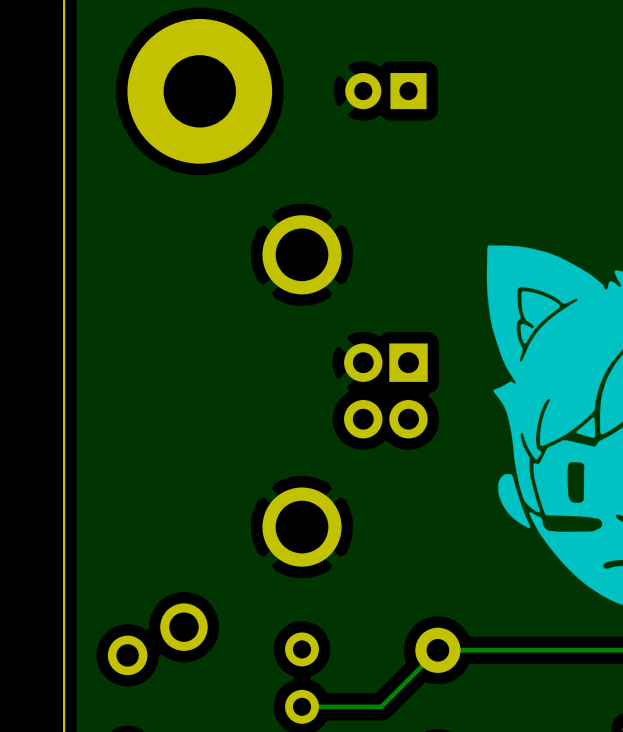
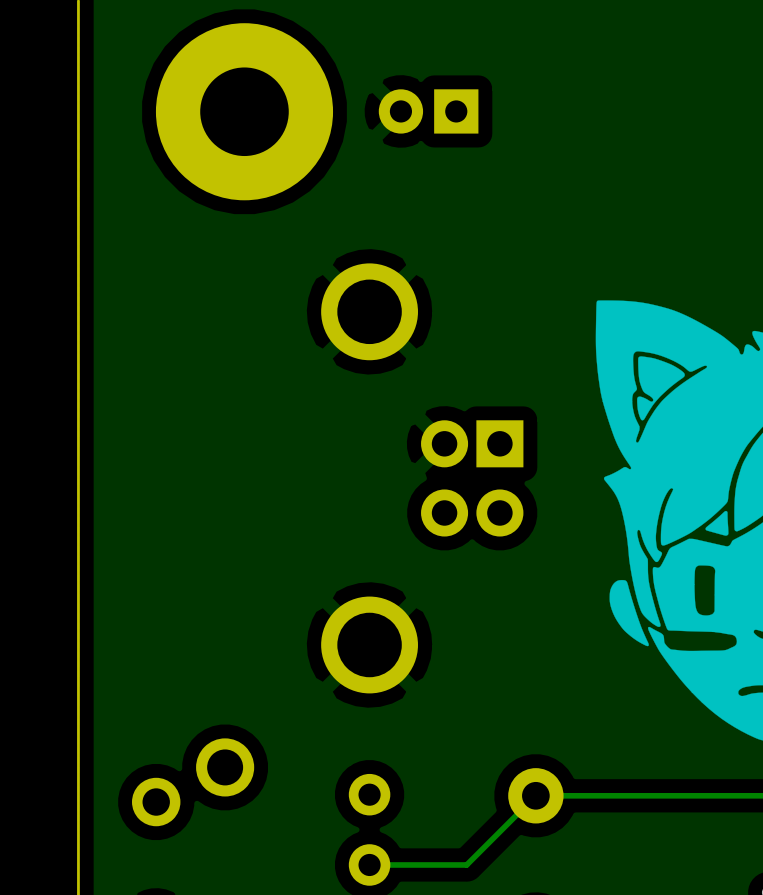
part position: (385, 91) -> (428, 111)

